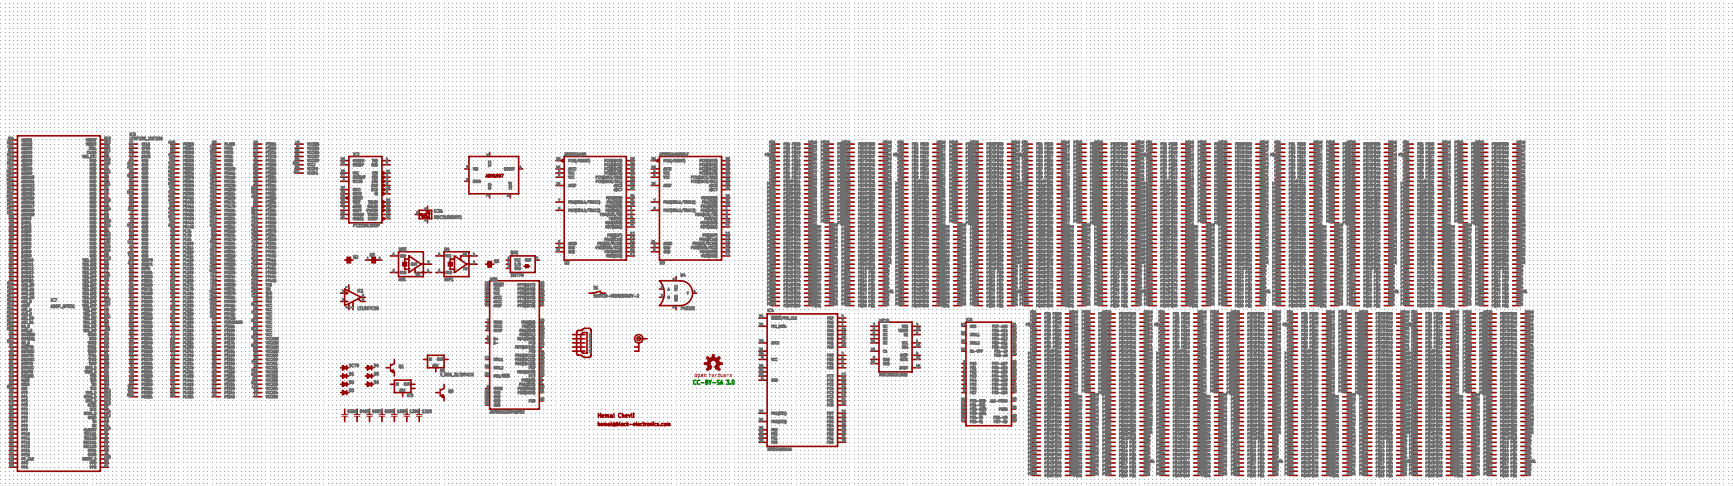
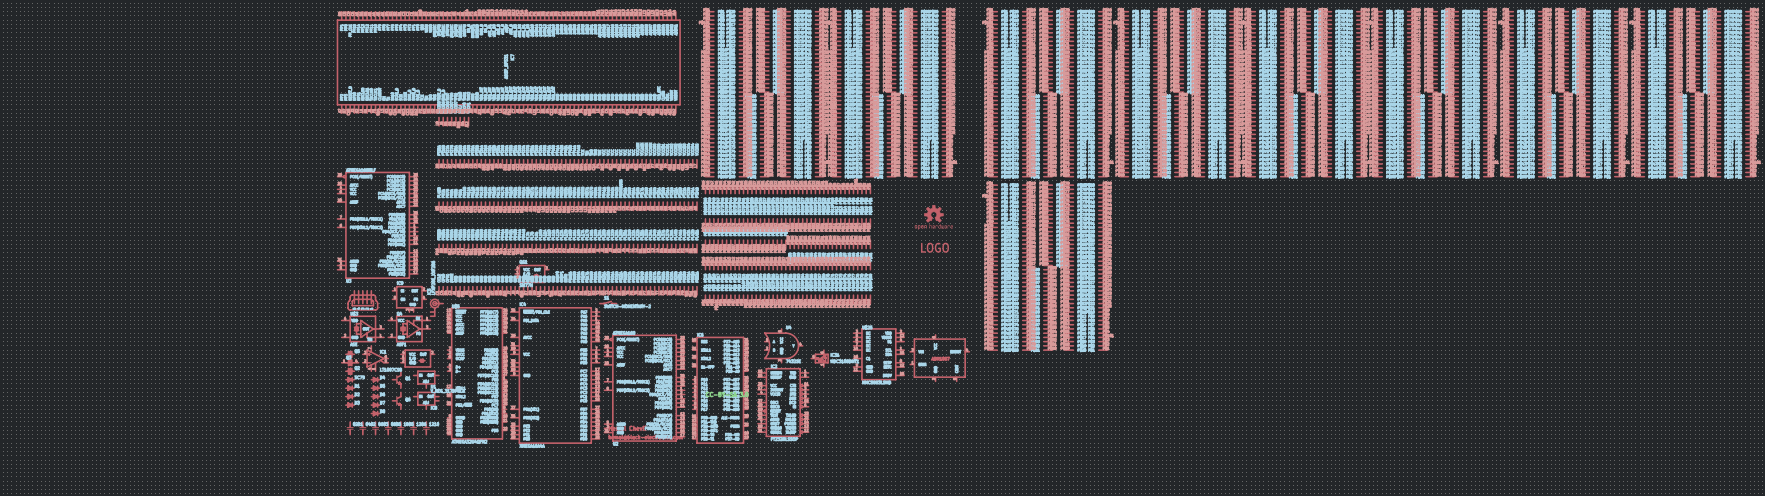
part: none -> (737, 94)
part: none -> (792, 94)
part: none -> (864, 94)
part: none -> (919, 94)
part: none -> (1020, 94)
part: none -> (1075, 94)
part: none -> (1151, 94)
part: none -> (1206, 94)
part: none -> (1278, 94)
part: none -> (1333, 94)
part: none -> (1405, 94)
part: none -> (1460, 94)
part: none -> (1536, 94)
part: none -> (1591, 94)
part: none -> (1667, 94)
part: none -> (1722, 94)
part: (493, 175) -> none
part position: (365, 189) -> (783, 402)
part position: (595, 208) -> (644, 388)
part position: (690, 208) -> (377, 225)
part: none -> (787, 216)
part: none -> (933, 217)
part position: (423, 214) -> (819, 358)
part: (802, 224) -> none
part: (856, 224) -> none
part: (930, 224) -> none
part: (984, 224) -> none
part: (1054, 224) -> none
part: (1108, 224) -> none
part: (1179, 224) -> none
part: (1233, 224) -> none
part: (1307, 224) -> none
part: (1361, 224) -> none
part: (1436, 224) -> none
part: (1489, 224) -> none
part: none -> (934, 247)
part: none -> (1020, 267)
part: none -> (1075, 267)
part position: (348, 260) -> (350, 371)
part position: (373, 260) -> (350, 362)
part: none -> (787, 271)
part position: (410, 264) -> (362, 328)
part position: (456, 264) -> (409, 328)
part position: (489, 264) -> (350, 354)
part rotation: 0° (216, 270) -> 90° counterclockwise (567, 206)
part position: (216, 270) -> (567, 206)
part: none -> (409, 299)
part: none -> (362, 300)
part position: (677, 293) -> (783, 345)
part position: (352, 297) -> (375, 358)
part: none -> (436, 307)
part rotation: 0° (58, 303) -> 90° clockwise (508, 62)
part position: (58, 303) -> (508, 62)
part: (581, 342) -> none
part: (640, 342) -> none
part position: (514, 344) -> (477, 373)
part: none -> (939, 358)
part: none -> (417, 358)
part position: (895, 347) -> (878, 354)
part position: (435, 363) -> (426, 379)
part: (713, 366) -> none
part position: (988, 373) -> (720, 390)
part position: (802, 380) -> (555, 375)
part position: (402, 388) -> (426, 400)
part: none -> (375, 405)
part position: (439, 392) -> (396, 400)
part: (1063, 394) -> none
part: (1117, 394) -> none
part: (1191, 394) -> none
part: (1245, 394) -> none
part: (1320, 394) -> none
part: (1373, 394) -> none
part: (1444, 394) -> none
part: (1498, 394) -> none
part: none -> (375, 413)

